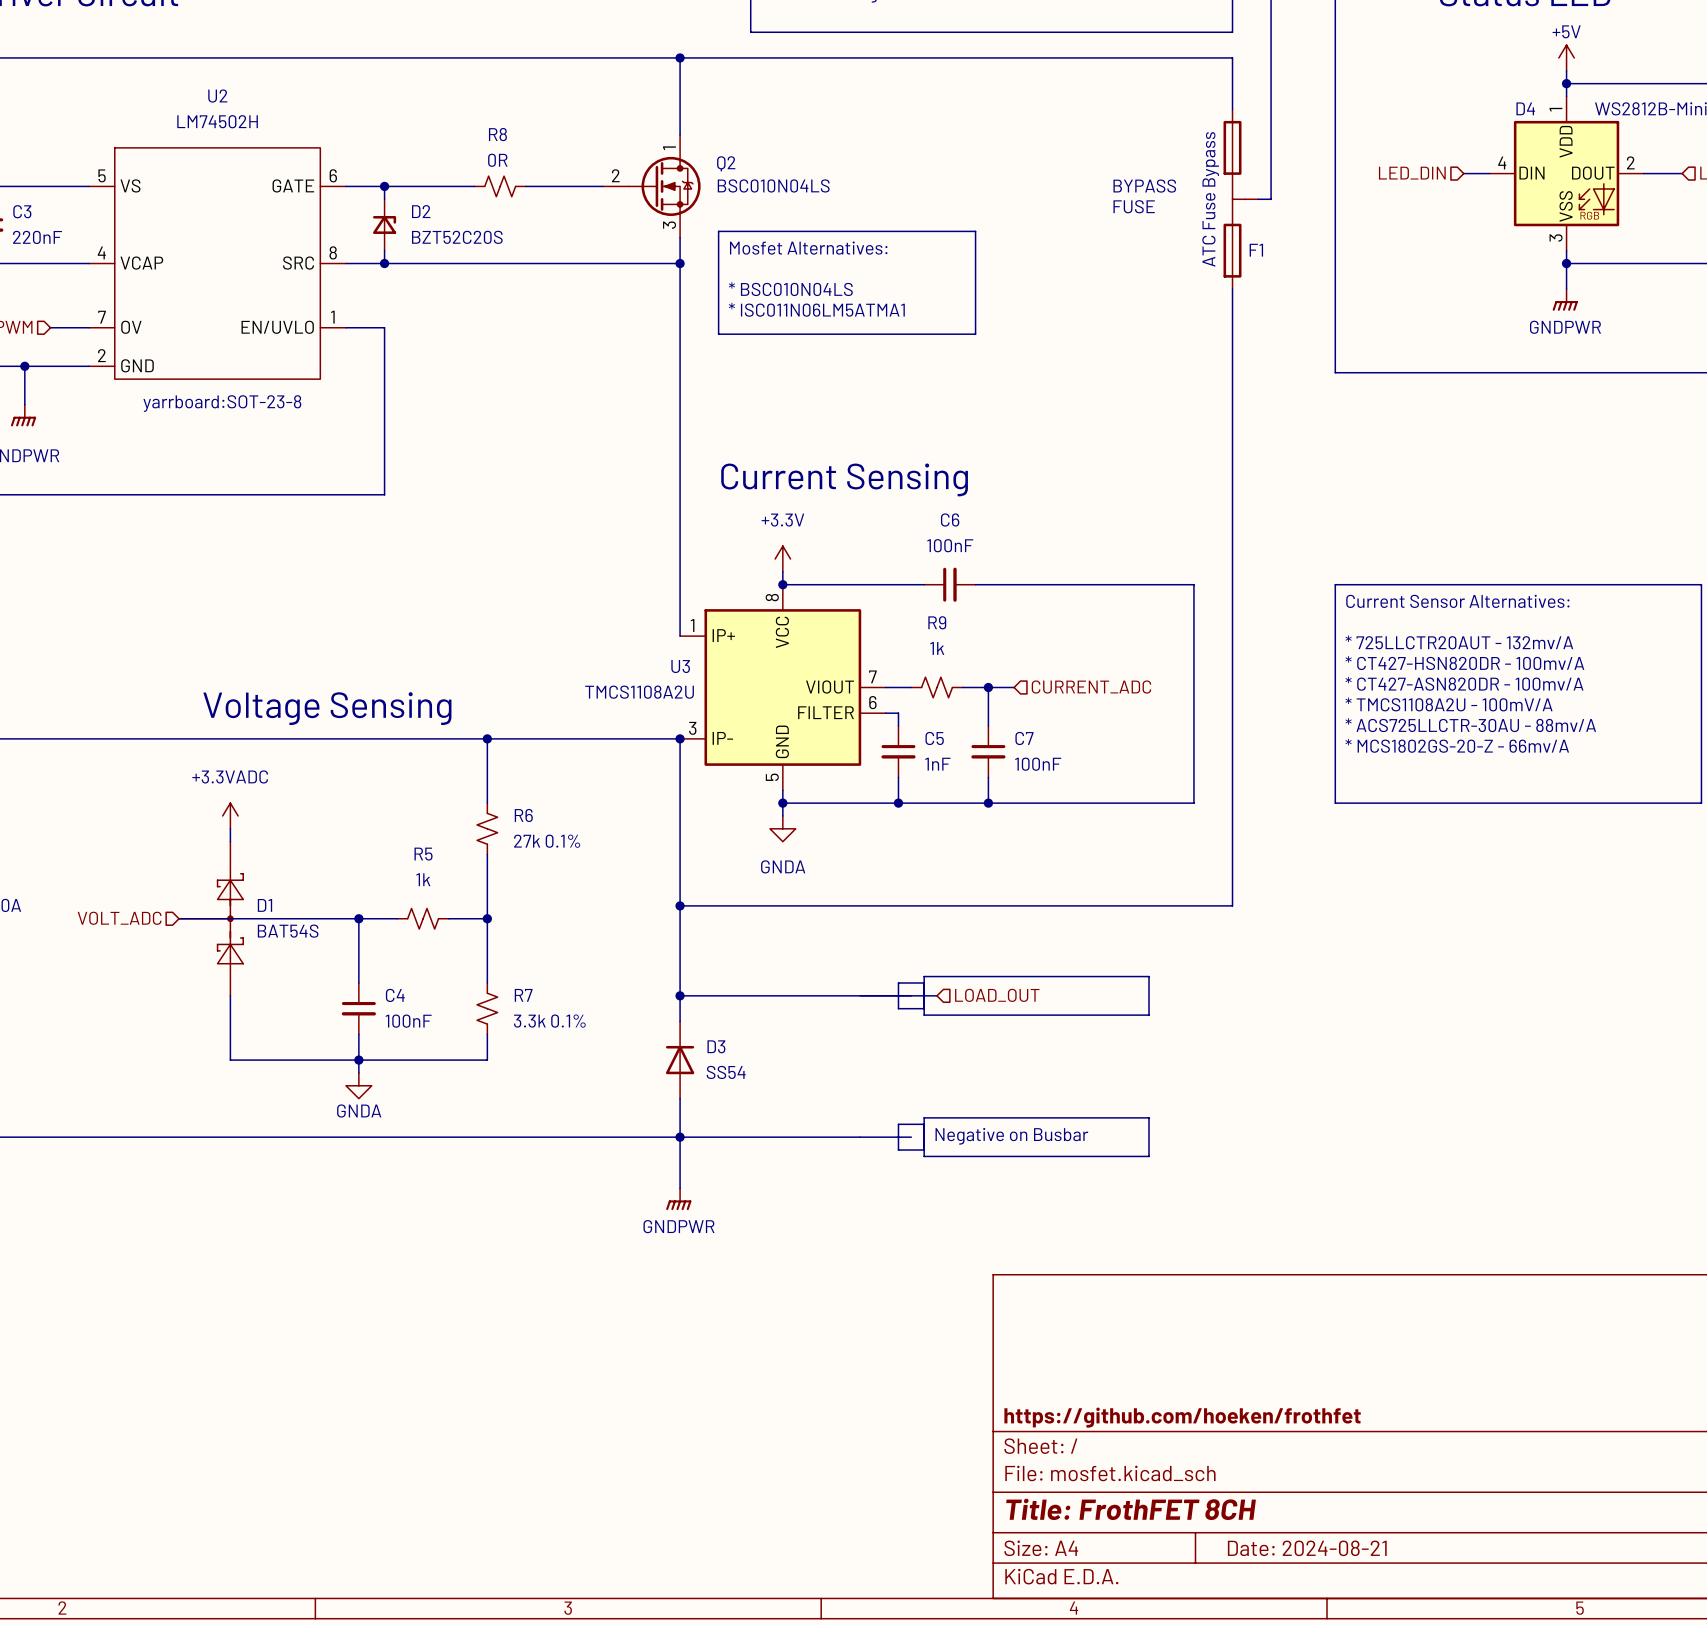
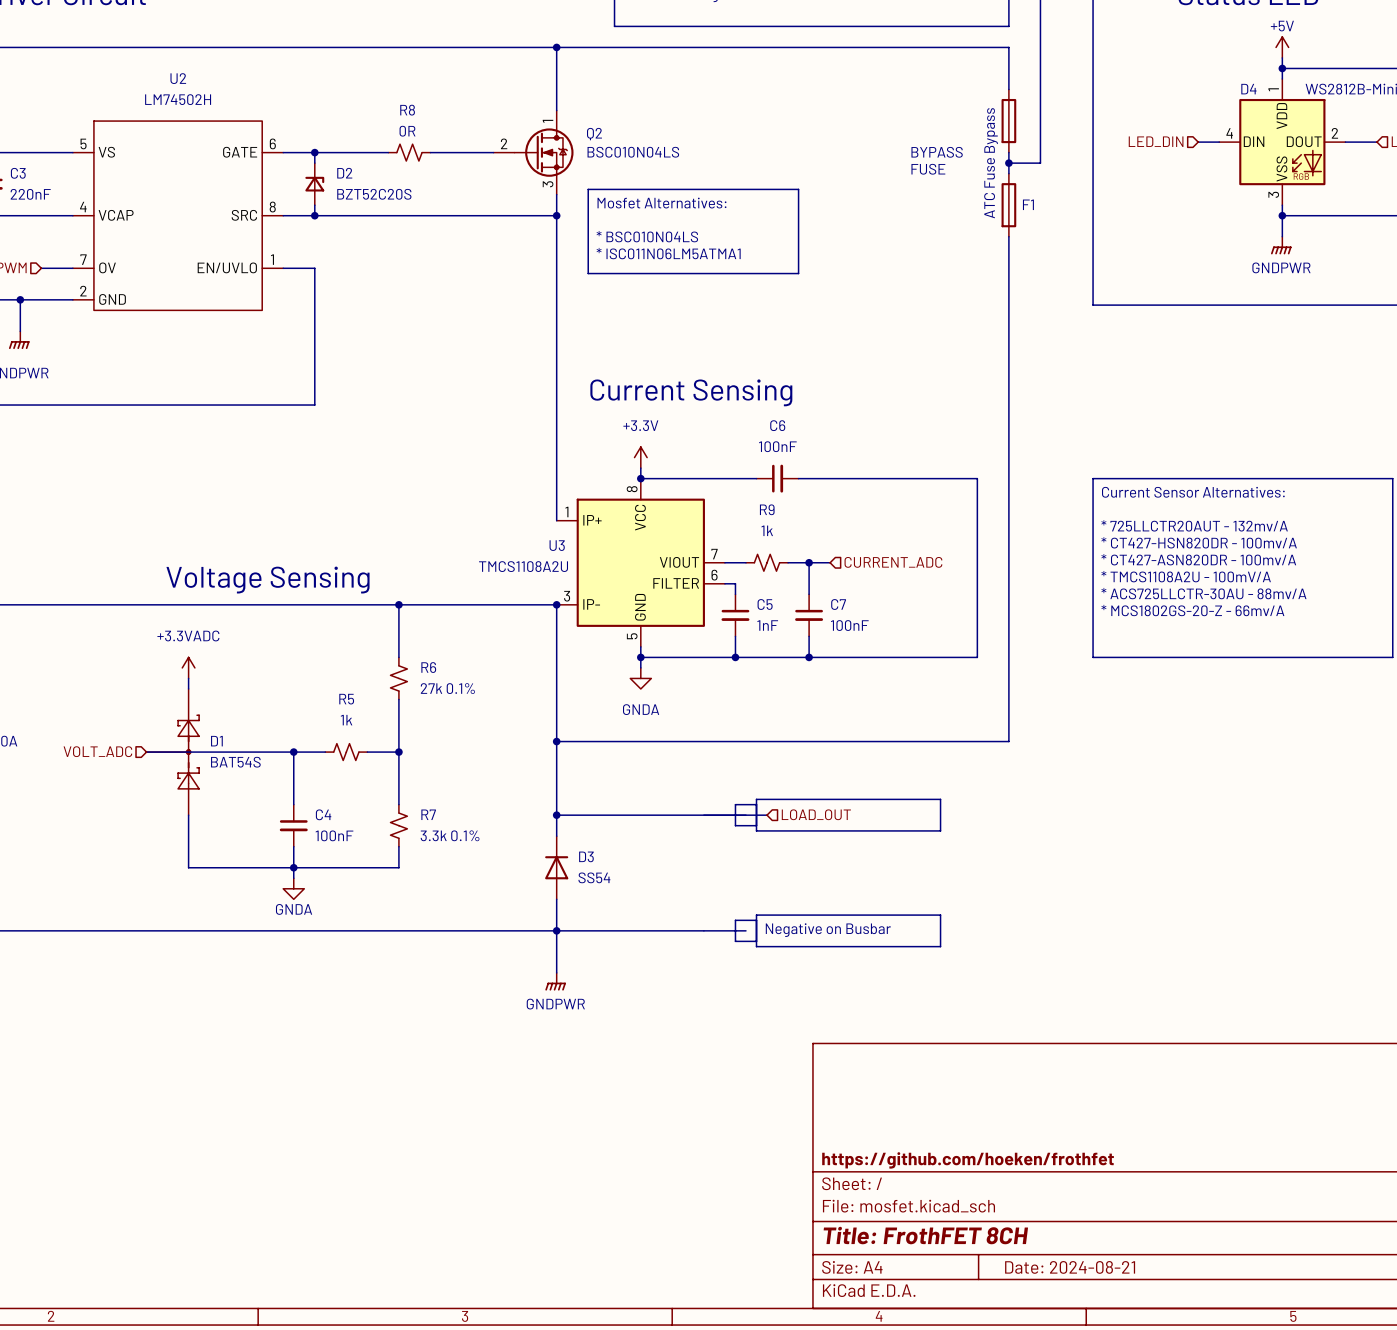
F1 symbol: [1223, 109, 1259, 290] -> [1001, 89, 1017, 237]
junction: none -> (1008, 163)
U2 text: yarrboard:SOT-23-8 (222, 403) -> none

